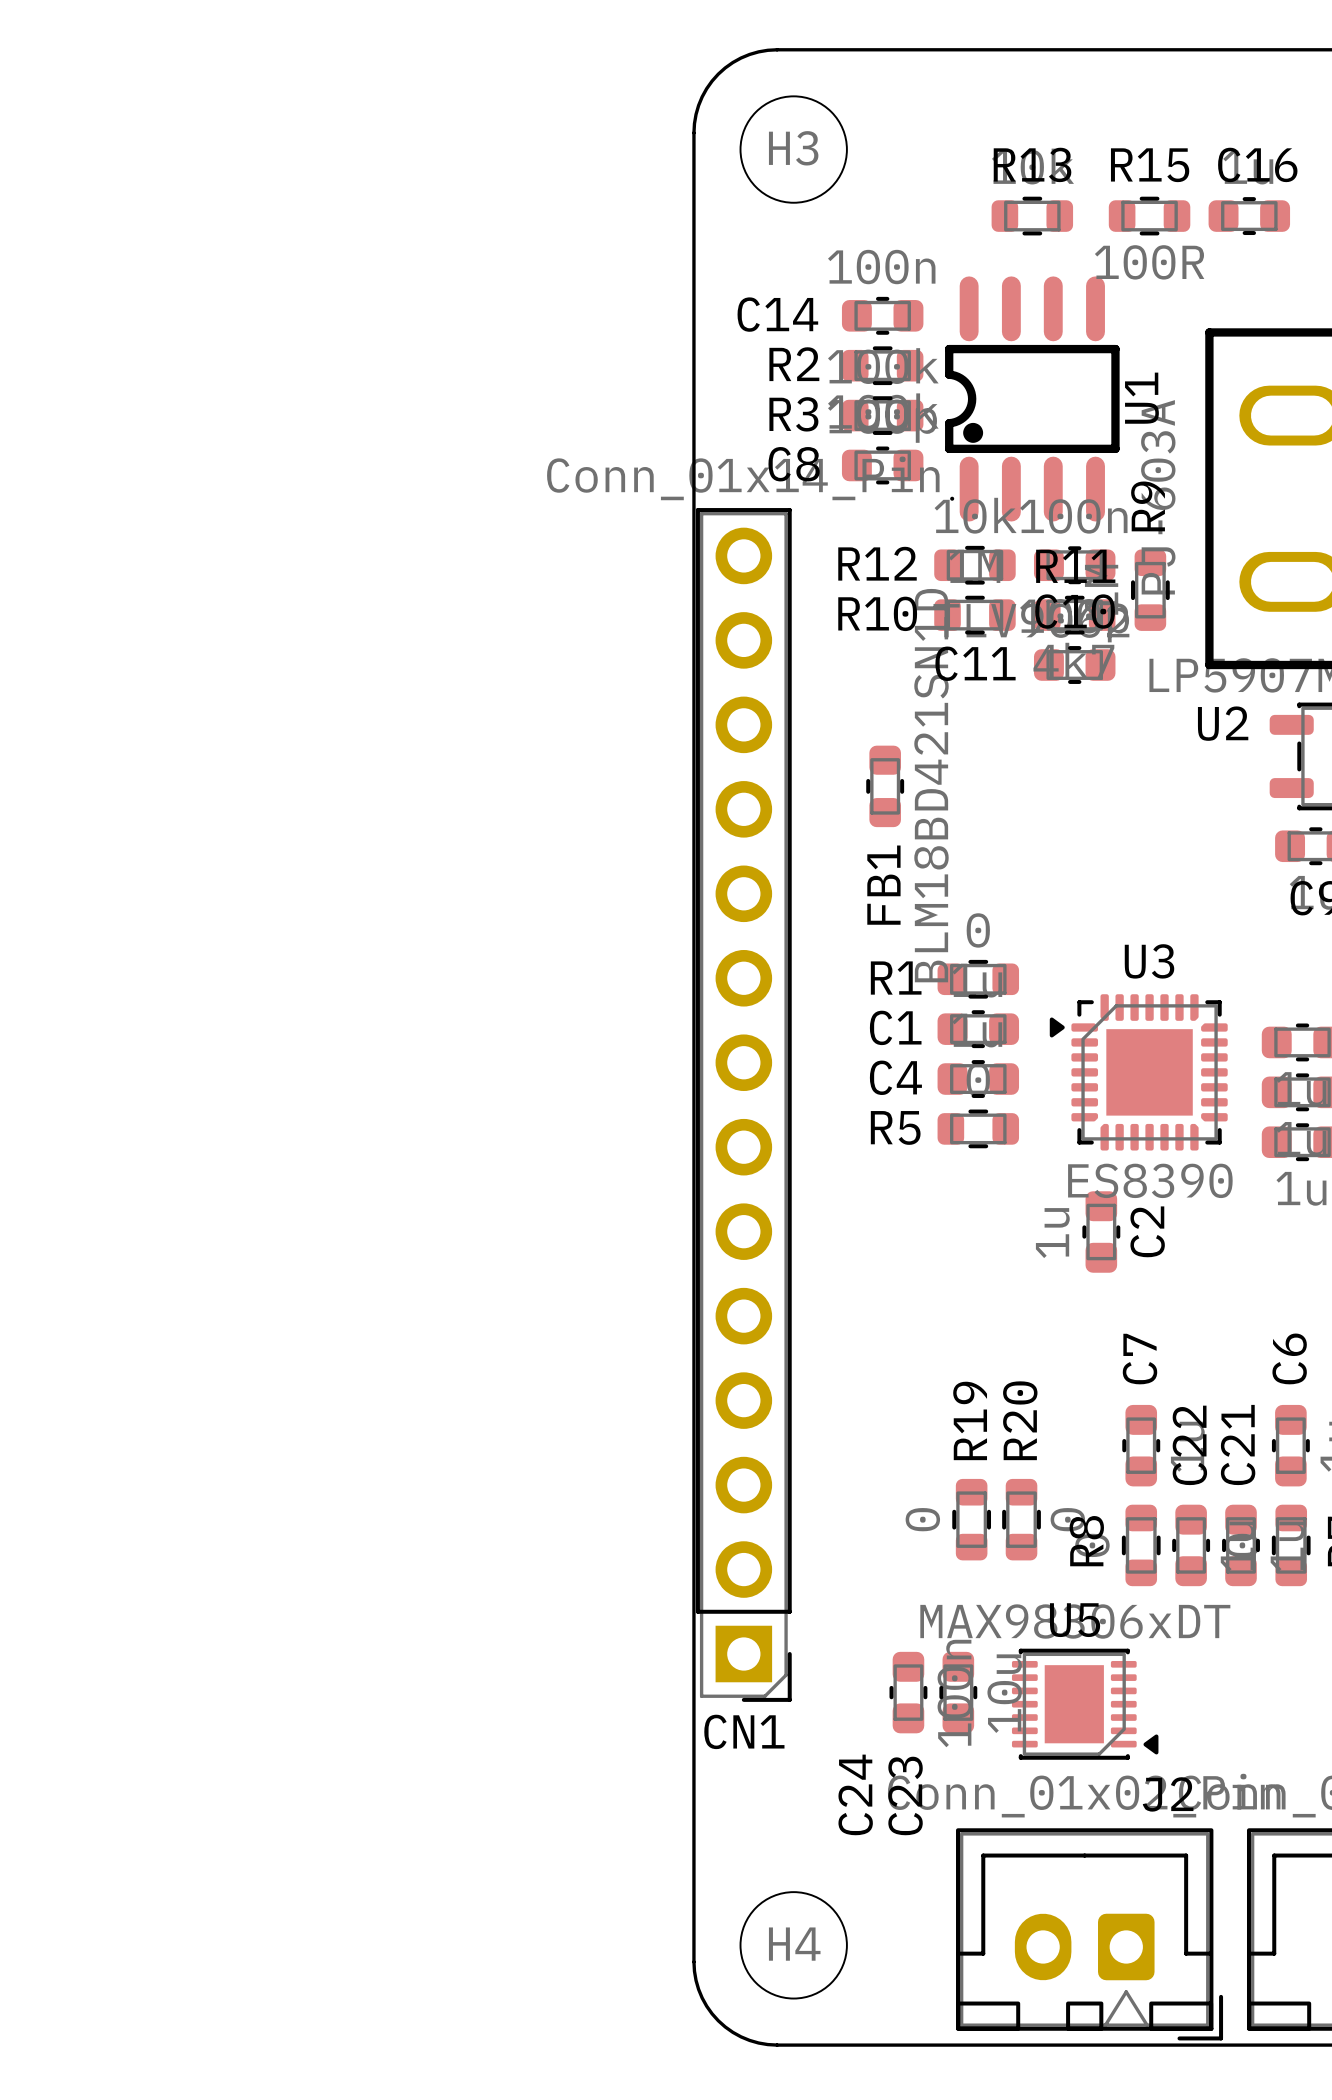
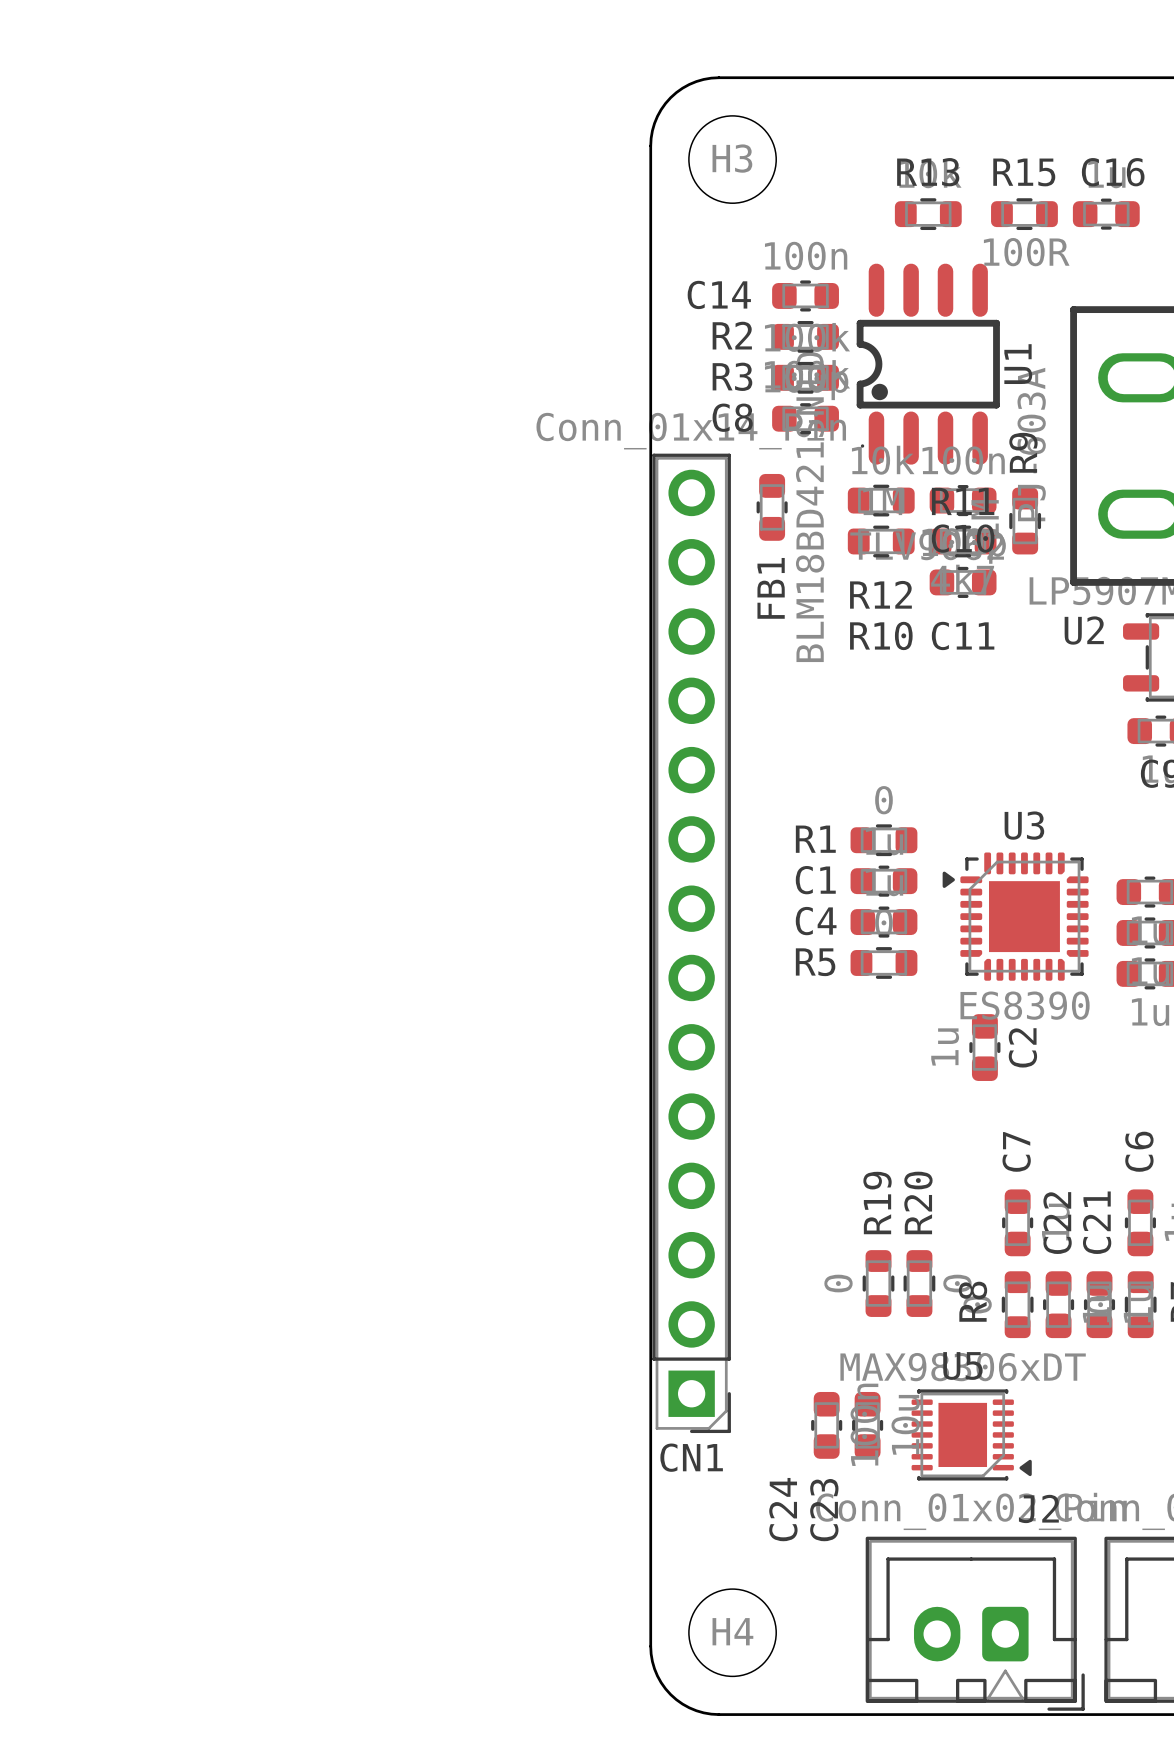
R12 name position: R12 (877, 563) -> R12 (880, 594)
R10 name position: R10 (877, 613) -> R10 (881, 635)
C11 name position: C11 (975, 663) -> C11 (963, 635)
FB1 position: (885, 786) -> (772, 507)

